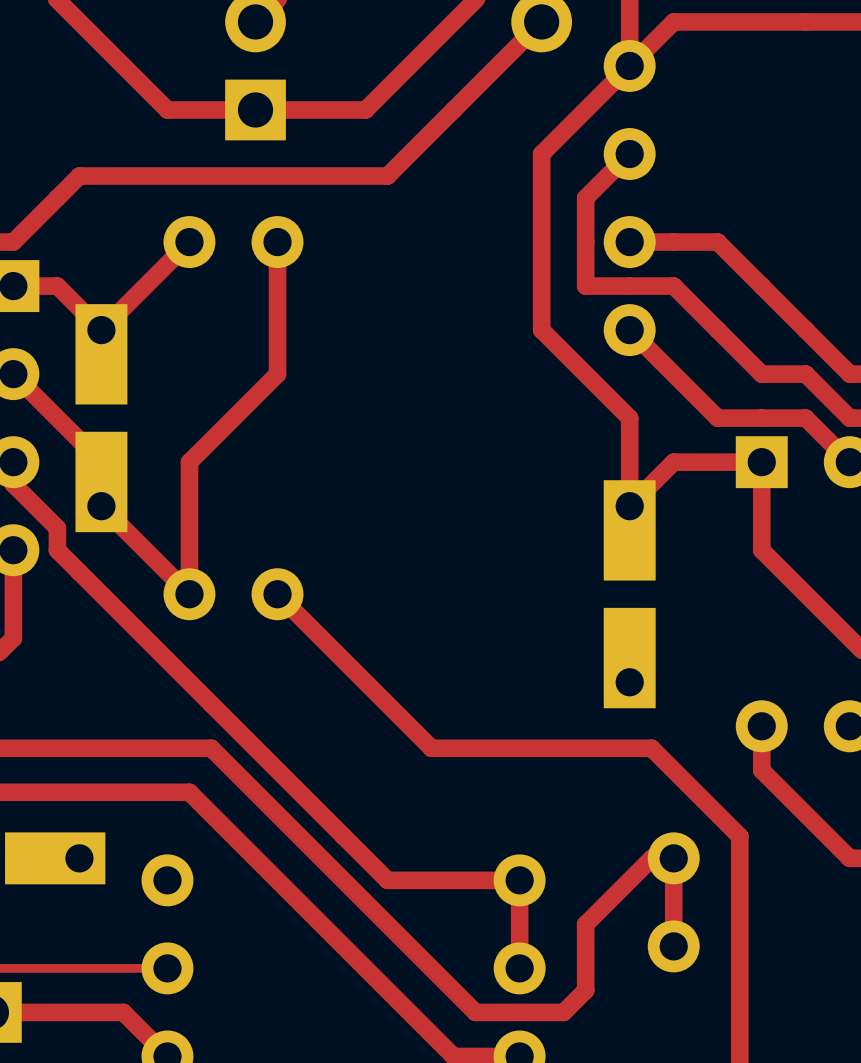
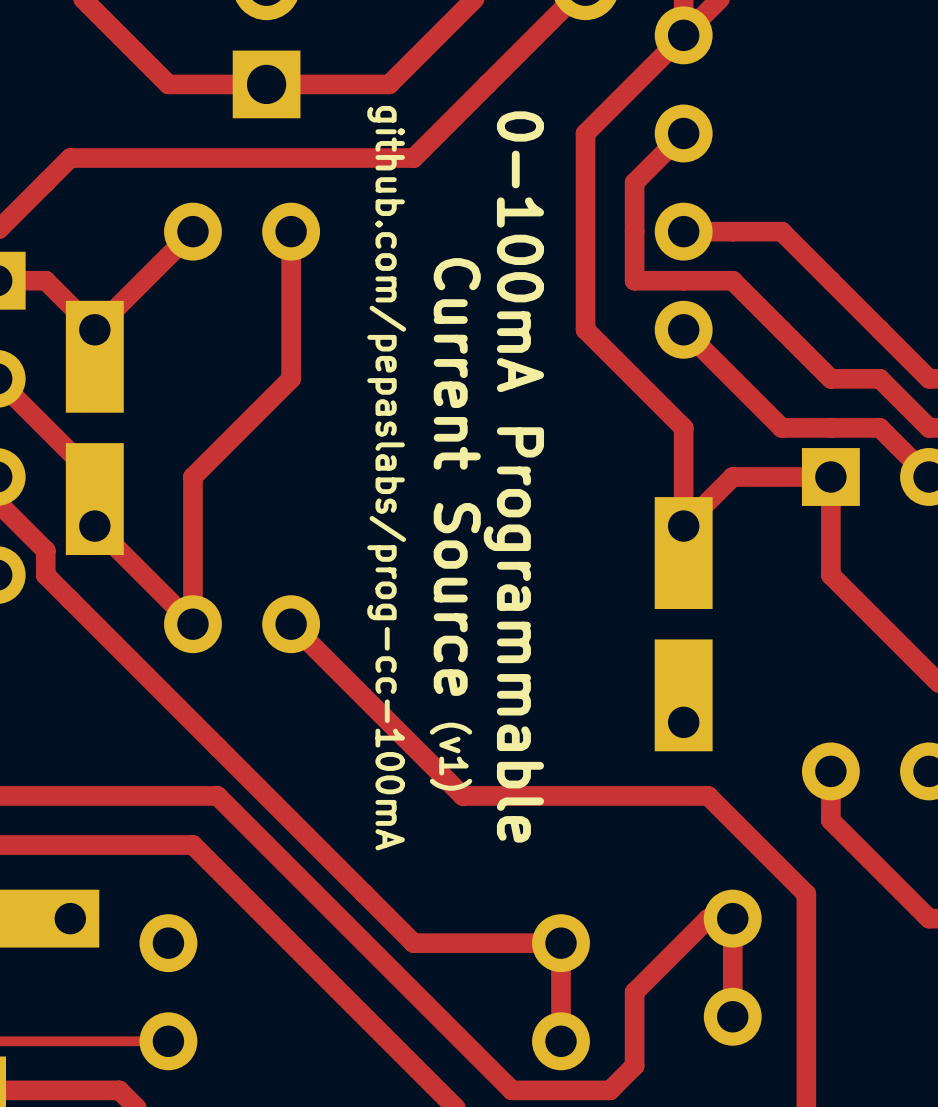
text: none -> Current Source (457, 476)
text: none -> 0-100mA Programmable (513, 476)
text: none -> github.com/pepaslabs/prog-cc-100mA (386, 478)
text: none -> (v1) (451, 756)

